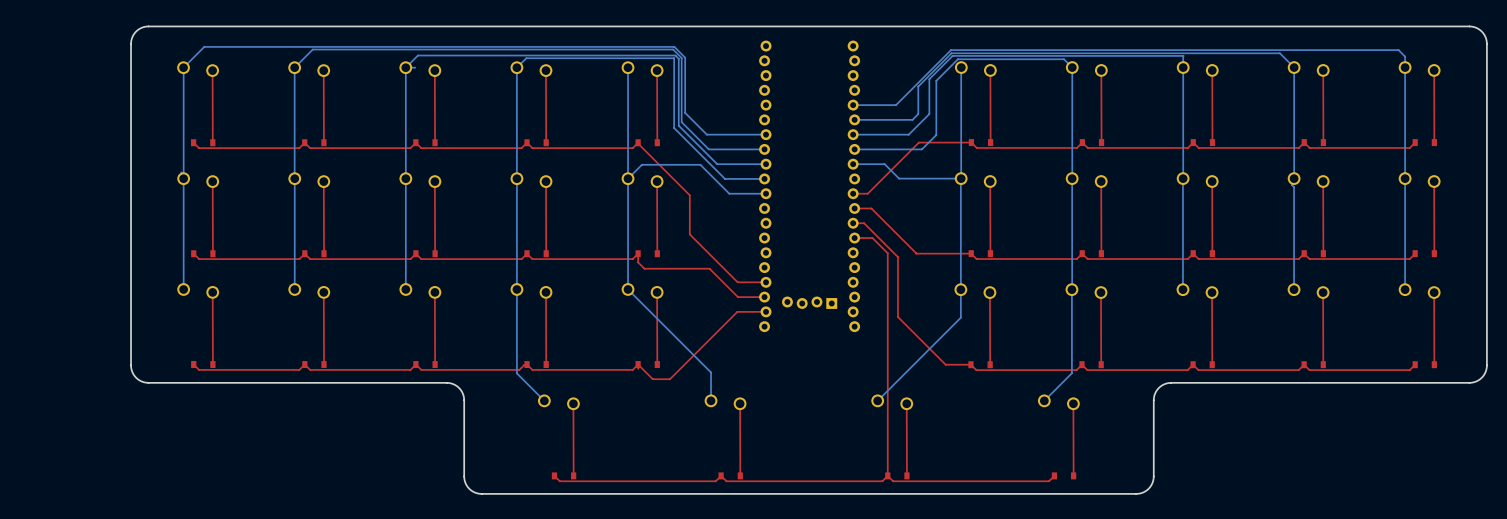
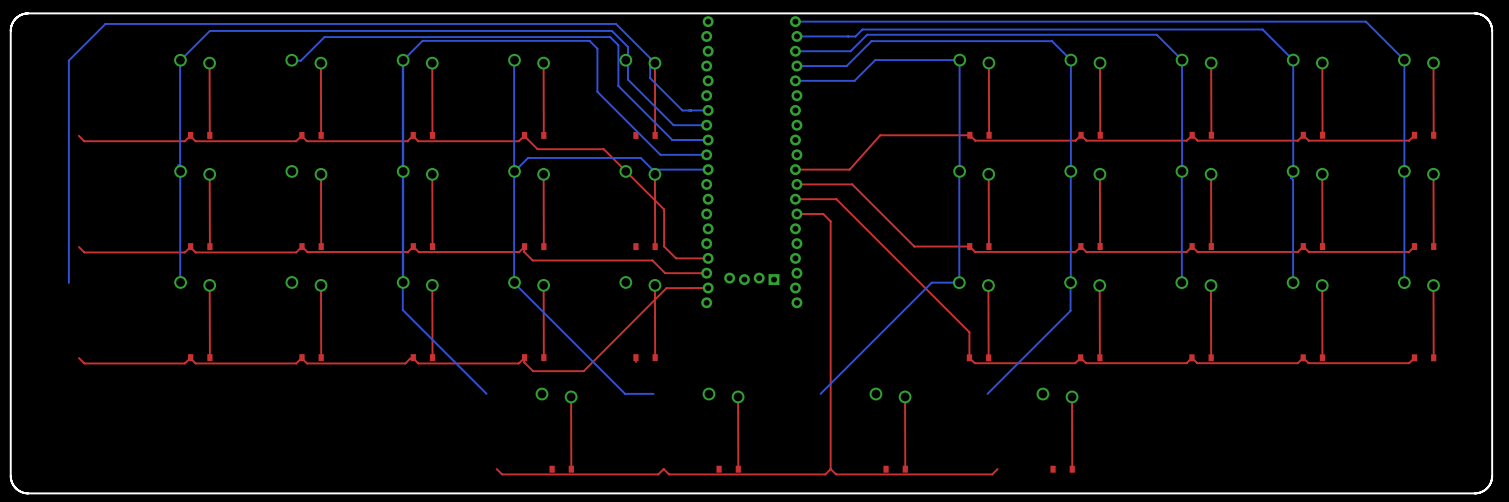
board edge: (1469, 26) (143, 27) (134, 33) (131, 43) (131, 369) (137, 379) (148, 382) (453, 384) (460, 389) (464, 398) (464, 480) (471, 490) (479, 493) (1140, 493) (1148, 488) (1153, 480) (1153, 398) (1157, 389) (1164, 384) (1469, 382) (1478, 380) (1483, 376) (1486, 365) (1486, 43) (1481, 31) (1469, 26) -> (1475, 13) (1487, 18) (1492, 30) (1492, 476) (1488, 486) (1479, 492) (28, 493) (18, 490) (11, 481) (10, 30) (14, 20) (22, 14) (1475, 13)
bottom track: none -> (848, 36) (796, 36)
bottom track: (1279, 53) (951, 53) (918, 86) (918, 114) (912, 119) (854, 119) -> (1278, 45) (1262, 29) (862, 29) (855, 36) (848, 36)
bottom track: (1063, 59) (957, 59) (936, 80) (936, 134) (921, 149) (854, 149) -> (1062, 51) (1051, 41) (871, 41) (846, 66) (796, 66)
bottom track: (415, 67) (405, 67) (417, 55) (675, 55) (678, 58) (678, 125) (717, 164) (766, 164) -> none
bottom track: (628, 67) (628, 289) (711, 372) (711, 400) -> none
bottom track: none -> (959, 60) (875, 60) (854, 80) (795, 80)
bottom track: (1183, 67) (1183, 55) (952, 55) (929, 79) (929, 114) (908, 134) (853, 134) -> (1182, 60) (1156, 34) (867, 34) (850, 51) (795, 51)
bottom track: (1405, 67) (1405, 56) (1398, 50) (951, 50) (896, 105) (853, 105) -> (1404, 60) (1365, 21) (795, 21)
bottom track: none -> (291, 60) (300, 60) (324, 37) (610, 37) (618, 45) (618, 86) (672, 140)
bottom track: none -> (514, 60) (514, 282) (625, 393) (653, 393)
bottom track: none -> (691, 110) (682, 110) (650, 78) (650, 58) (616, 23) (105, 23) (68, 60) (68, 282)
bottom track: none -> (708, 110) (688, 110)
bottom track: none -> (706, 125) (673, 125) (628, 79) (628, 46) (611, 30) (209, 30) (180, 60) (180, 282)
bottom track: (766, 134) (706, 134) (685, 112) (685, 57) (674, 46) (204, 46) (183, 67) (183, 289) -> none
top track: (193, 142) (198, 148) (299, 148) (304, 142) (310, 148) (410, 148) (415, 142) (421, 148) (521, 148) (526, 142) (532, 148) (632, 148) (638, 142) (689, 195) (689, 234) (737, 282) (766, 282) -> none
top track: (918, 142) (867, 193) (853, 193) -> (917, 135) (880, 135) (849, 169) (795, 169)
top track: none -> (78, 135) (84, 141) (184, 141) (190, 135) (195, 141) (296, 141) (301, 135) (306, 141) (407, 141) (412, 135) (418, 141) (518, 141) (524, 135) (537, 149) (603, 149) (664, 209) (664, 246) (676, 258) (708, 258)
bottom track: none -> (708, 140) (671, 140)
bottom track: (764, 149) (708, 149) (681, 122) (681, 58) (673, 49) (312, 49) (294, 67) (294, 289) -> none
bottom track: none -> (706, 154) (660, 154) (597, 91) (597, 48) (589, 40) (422, 40) (402, 60) (402, 310) (486, 393)
bottom track: (853, 164) (884, 164) (899, 178) (961, 178) -> none
bottom track: none -> (708, 169) (652, 169) (640, 157) (528, 157) (514, 171)
bottom track: (516, 178) (516, 67) (526, 58) (674, 58) (674, 128) (725, 178) (764, 178) -> none
bottom track: (516, 178) (516, 373) (544, 400) -> none
bottom track: (628, 178) (641, 164) (700, 164) (729, 193) (766, 193) -> none
part position: (809, 186) -> (751, 162)
top track: (854, 208) (871, 208) (916, 253) -> (796, 184) (852, 184) (914, 246)
top track: none -> (796, 214) (823, 214) (830, 221) (830, 469)
top track: (853, 223) (864, 223) (897, 257) (897, 316) (945, 364) (970, 364) -> (795, 199) (836, 199) (969, 332) (969, 357)
top track: (854, 238) (872, 238) (887, 253) (887, 475) -> none
top track: (193, 253) (199, 259) (299, 259) -> (78, 247) (84, 252) (184, 252) (190, 247) (195, 252) (296, 252)
top track: (526, 254) (532, 259) (632, 259) (638, 253) (638, 262) (644, 268) (709, 268) (737, 297) (764, 297) -> (524, 247) (524, 251) (532, 260) (652, 260) (665, 273) (706, 273)
bottom track: (960, 289) (960, 317) (877, 400) -> (959, 282) (931, 282) (820, 393)
top track: none -> (708, 287) (666, 288) (583, 371) (533, 371) (524, 362) (524, 358) (518, 363) (418, 363) (413, 358) (410, 358) (405, 363) (306, 363) (301, 358) (296, 363) (195, 363) (190, 358) (184, 363) (84, 363) (78, 358)
top track: (766, 311) (737, 311) (670, 379) (652, 379) (638, 364) (632, 369) (532, 369) (527, 365) (524, 365) (519, 369) (421, 369) (415, 364) (410, 369) (310, 369) (304, 364) (299, 369) (199, 369) (193, 364) -> none
bottom track: (1071, 317) (1071, 373) (1044, 400) -> (1070, 310) (987, 393)
top track: (887, 475) (882, 481) (726, 481) (721, 475) (715, 481) (559, 481) (554, 475) -> (830, 469) (825, 474) (669, 474) (663, 469) (658, 474) (502, 474) (496, 469)
top track: (1054, 475) (1049, 481) (893, 481) (887, 475) -> (997, 469) (992, 474) (836, 474) (830, 469)

